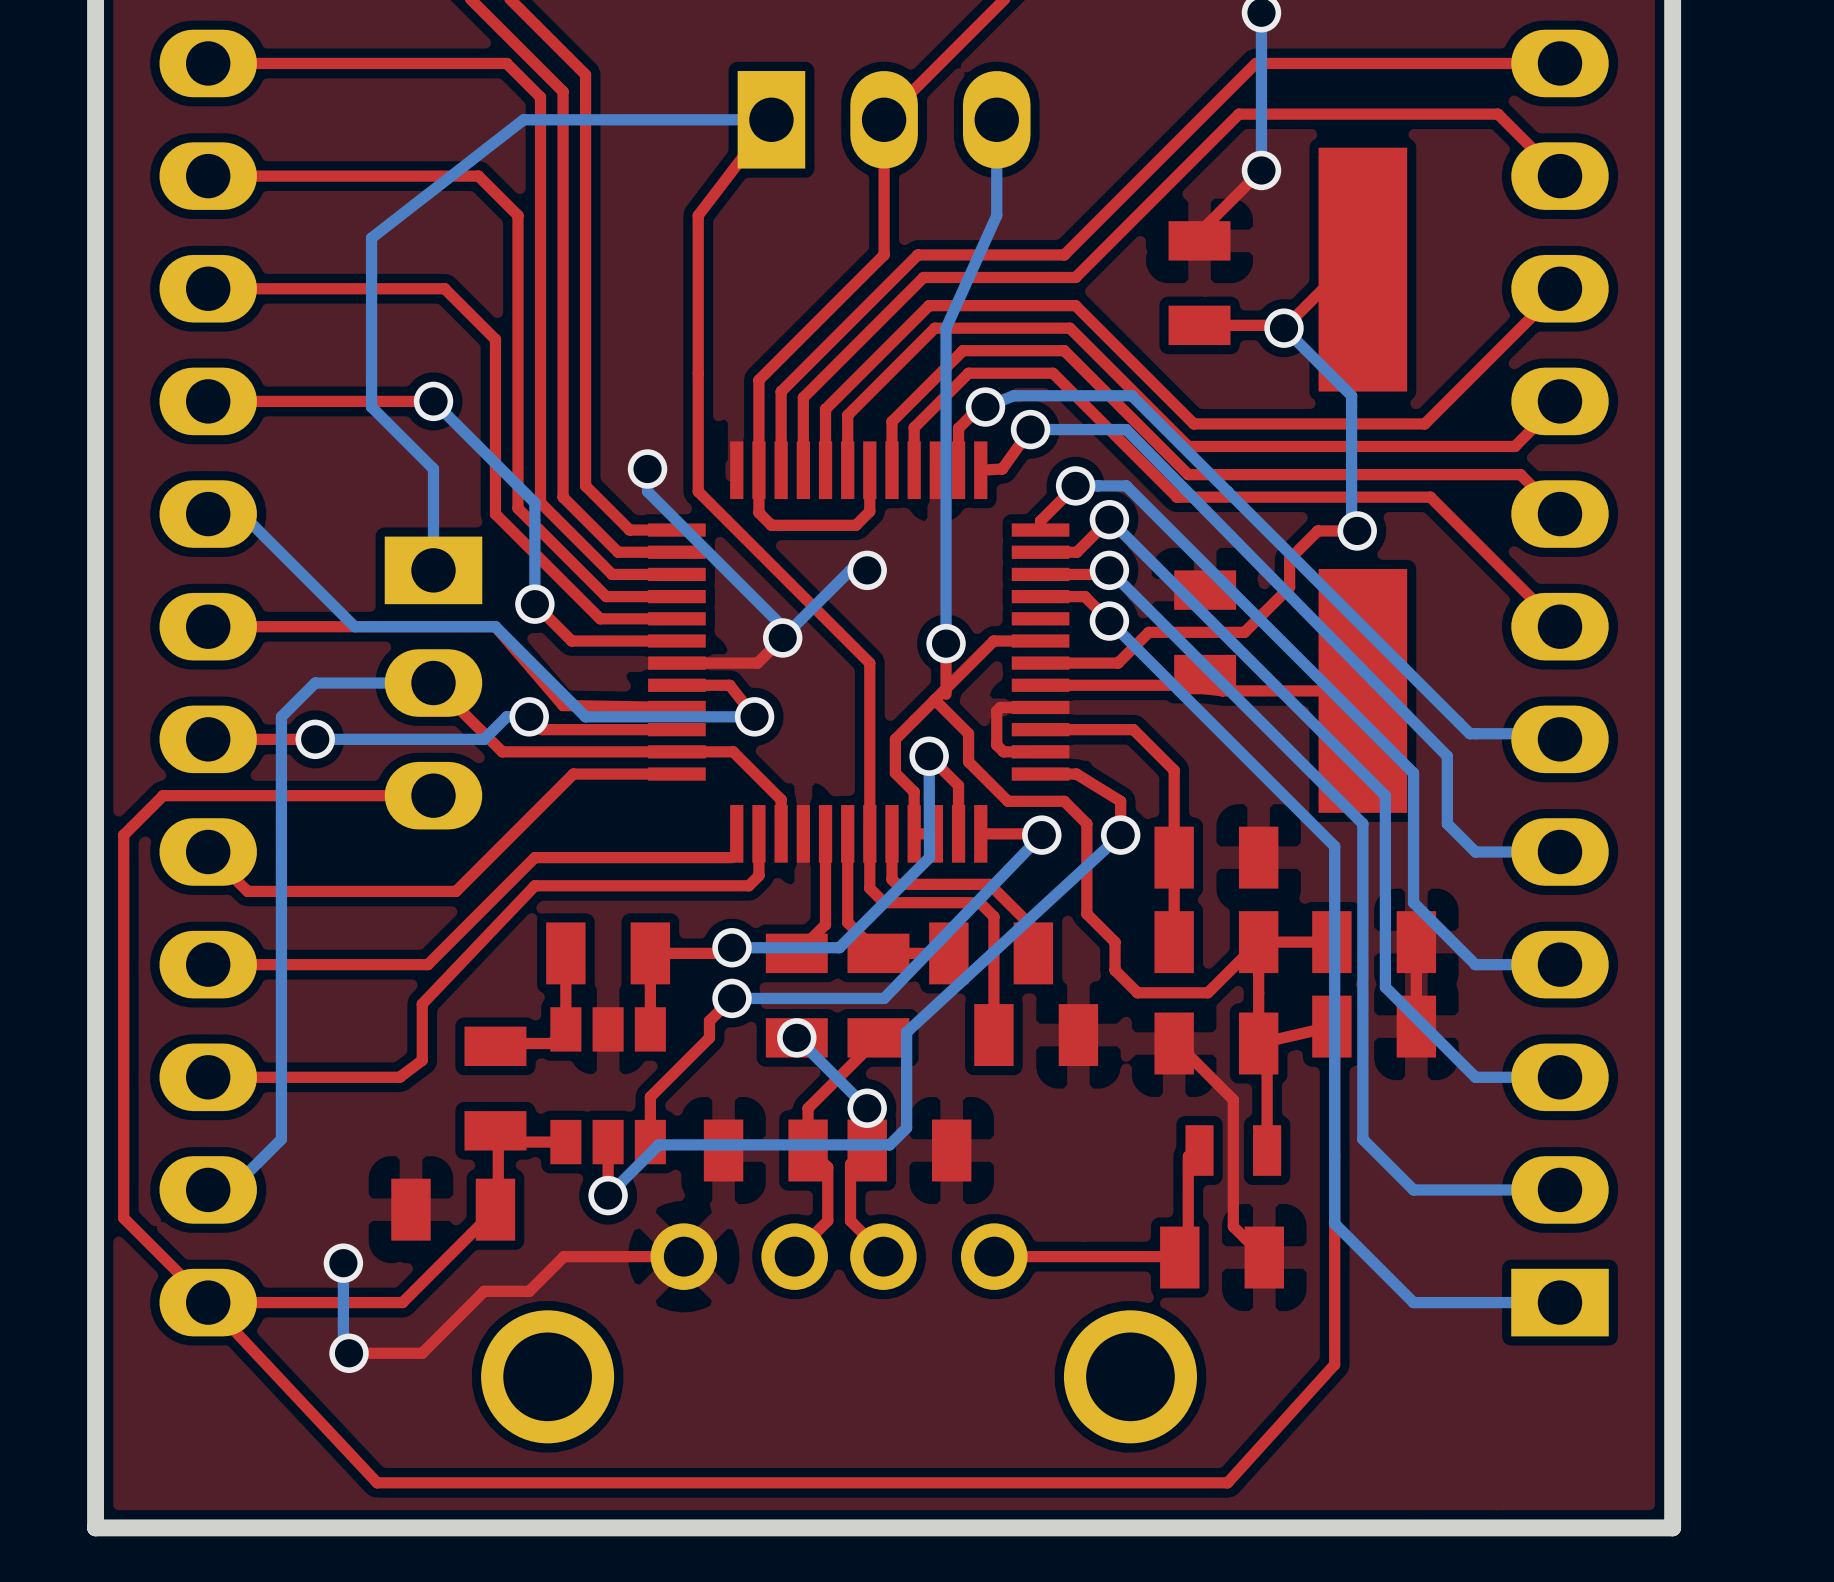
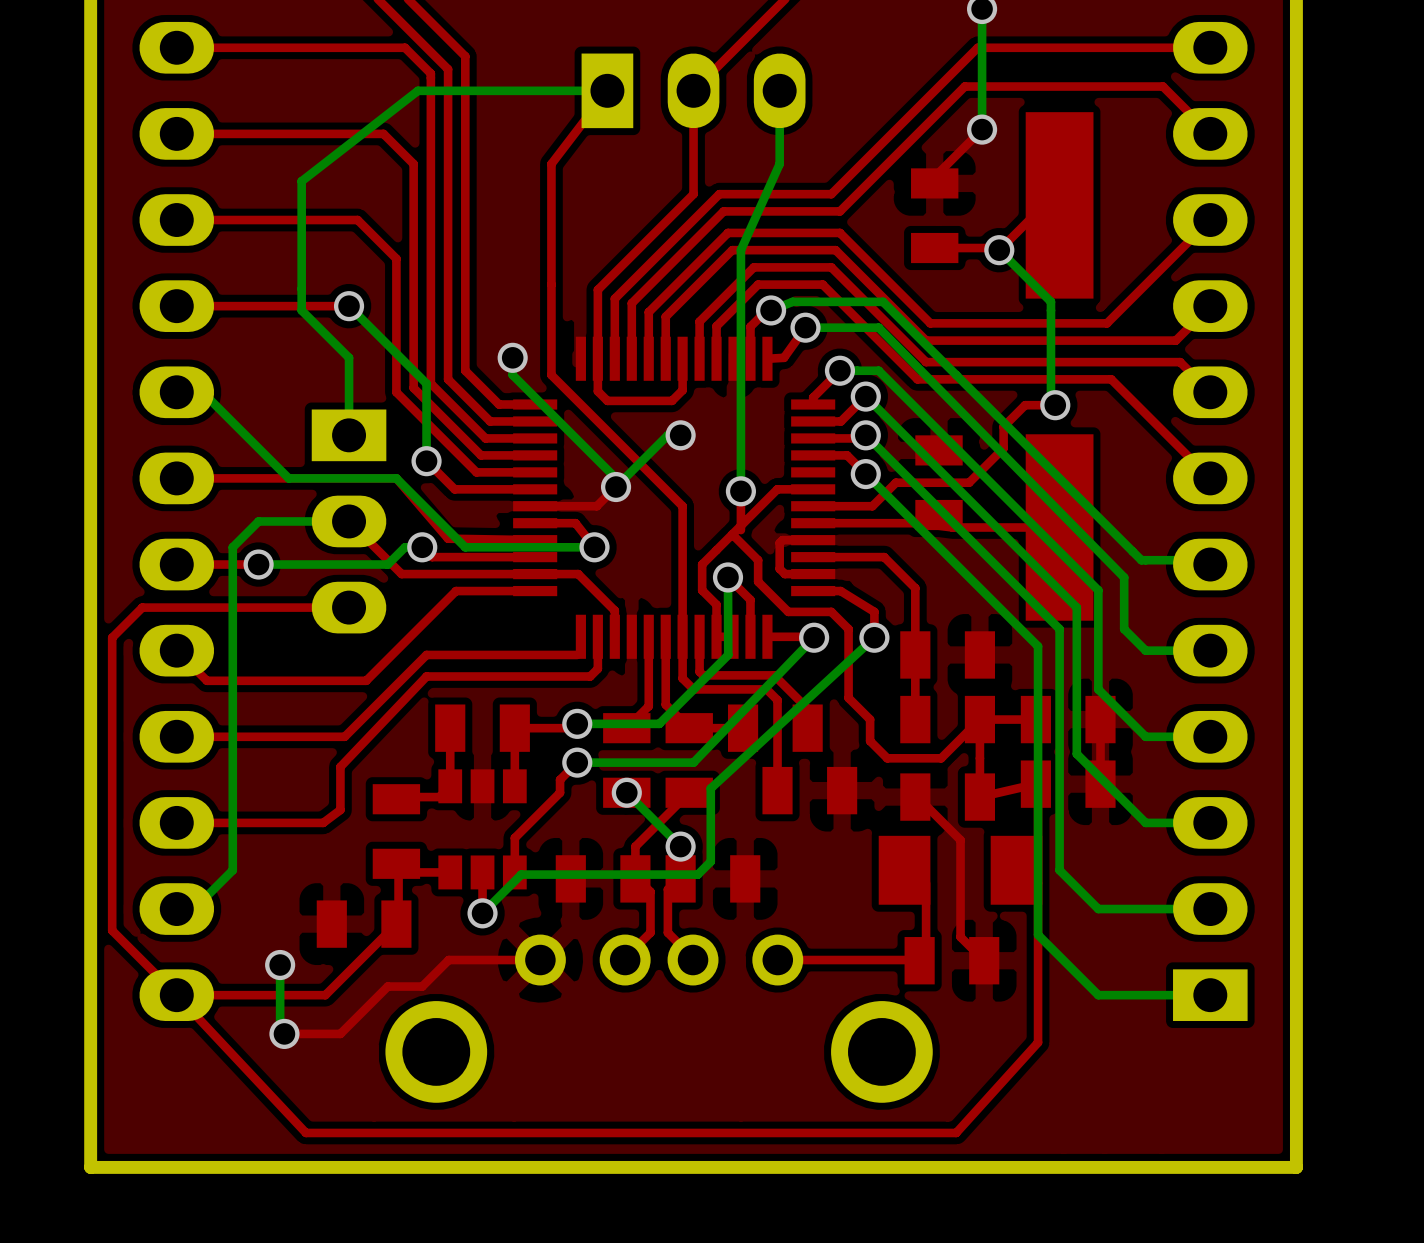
top track: (1258, 1043) (1267, 1051) (1267, 1150) -> none
part footprint: [1185, 1125, 1282, 1176] -> [878, 835, 1043, 905]

